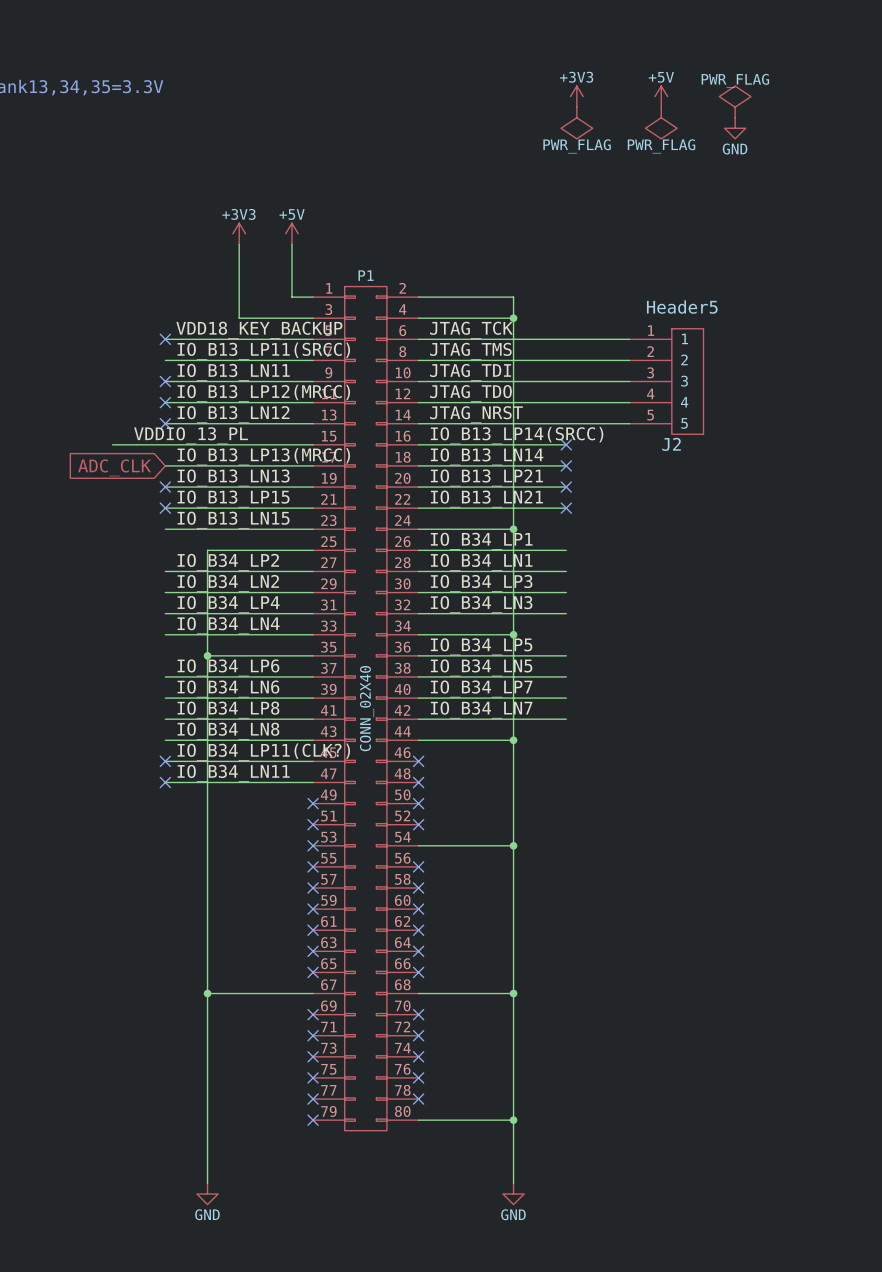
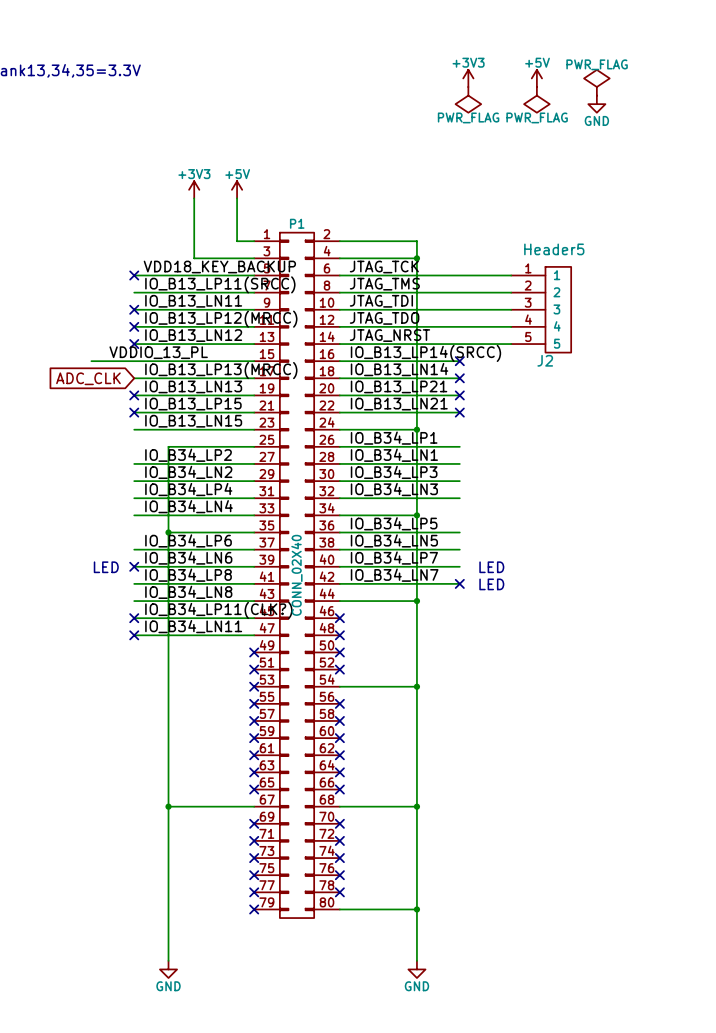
text: none -> LED (106, 567)
no-connect mark: none -> (134, 566)
text: none -> LED (491, 567)
no-connect mark: none -> (459, 583)
text: none -> LED (491, 584)

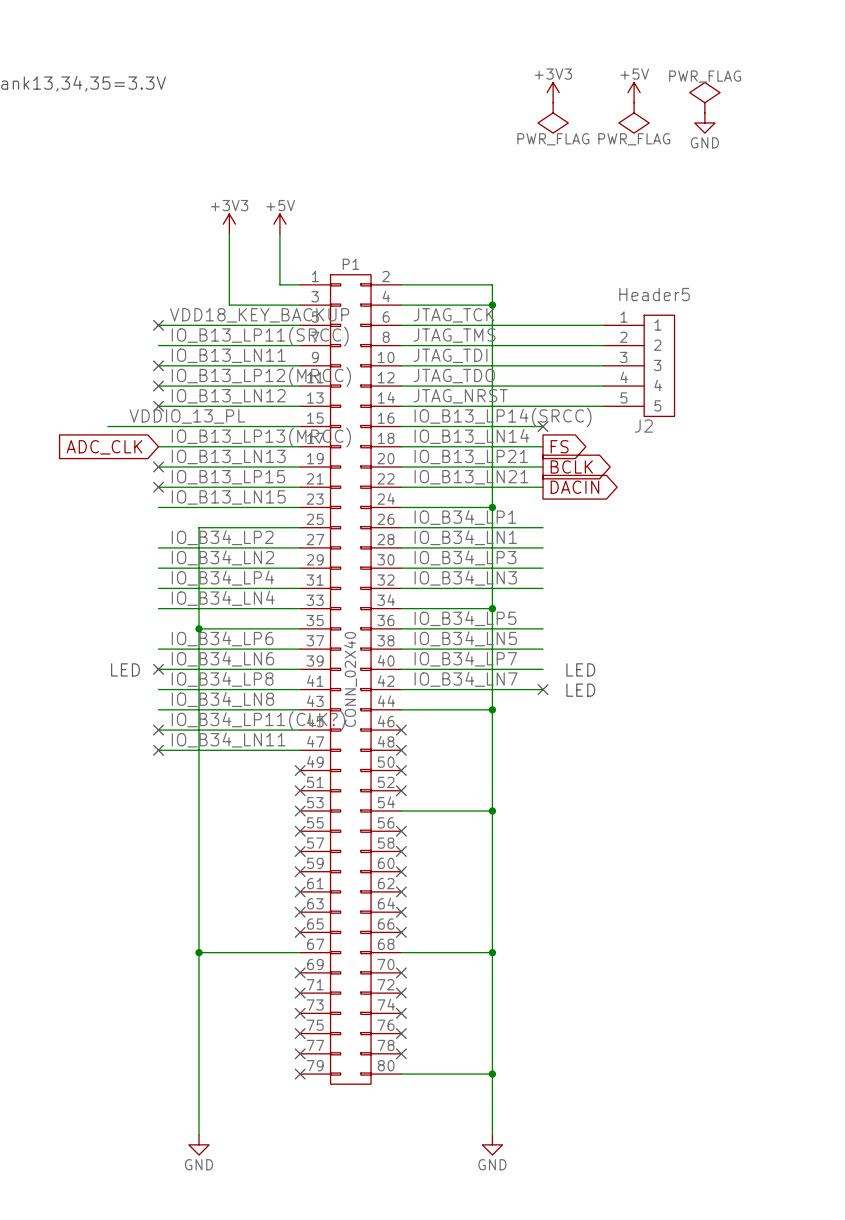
no-connect mark: (459, 378) -> none
global label: none -> FS (559, 446)
no-connect mark: (459, 395) -> none
global label: none -> BCLK (571, 466)
no-connect mark: (459, 412) -> none
global label: none -> DACIN (574, 487)

